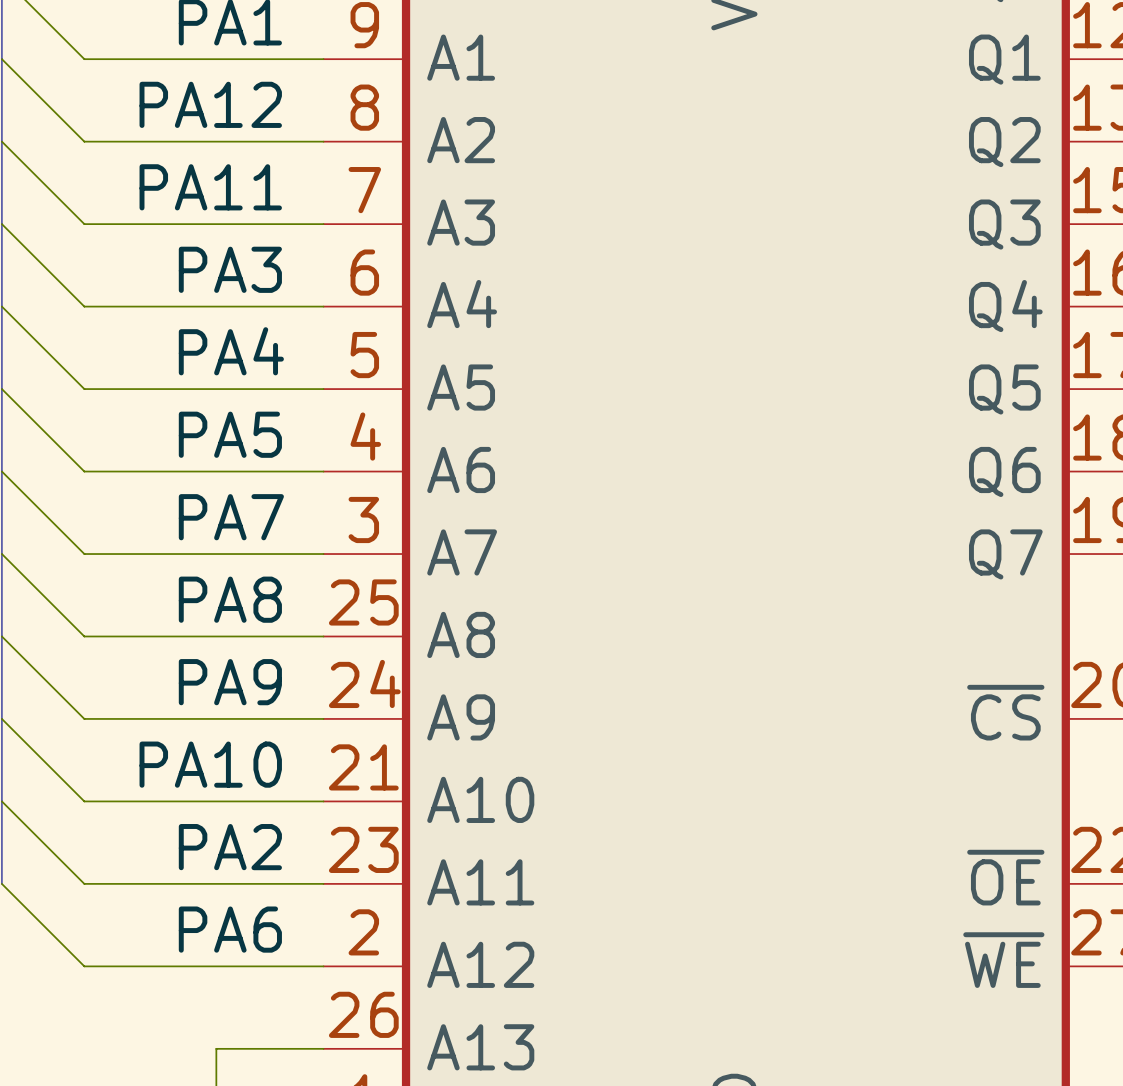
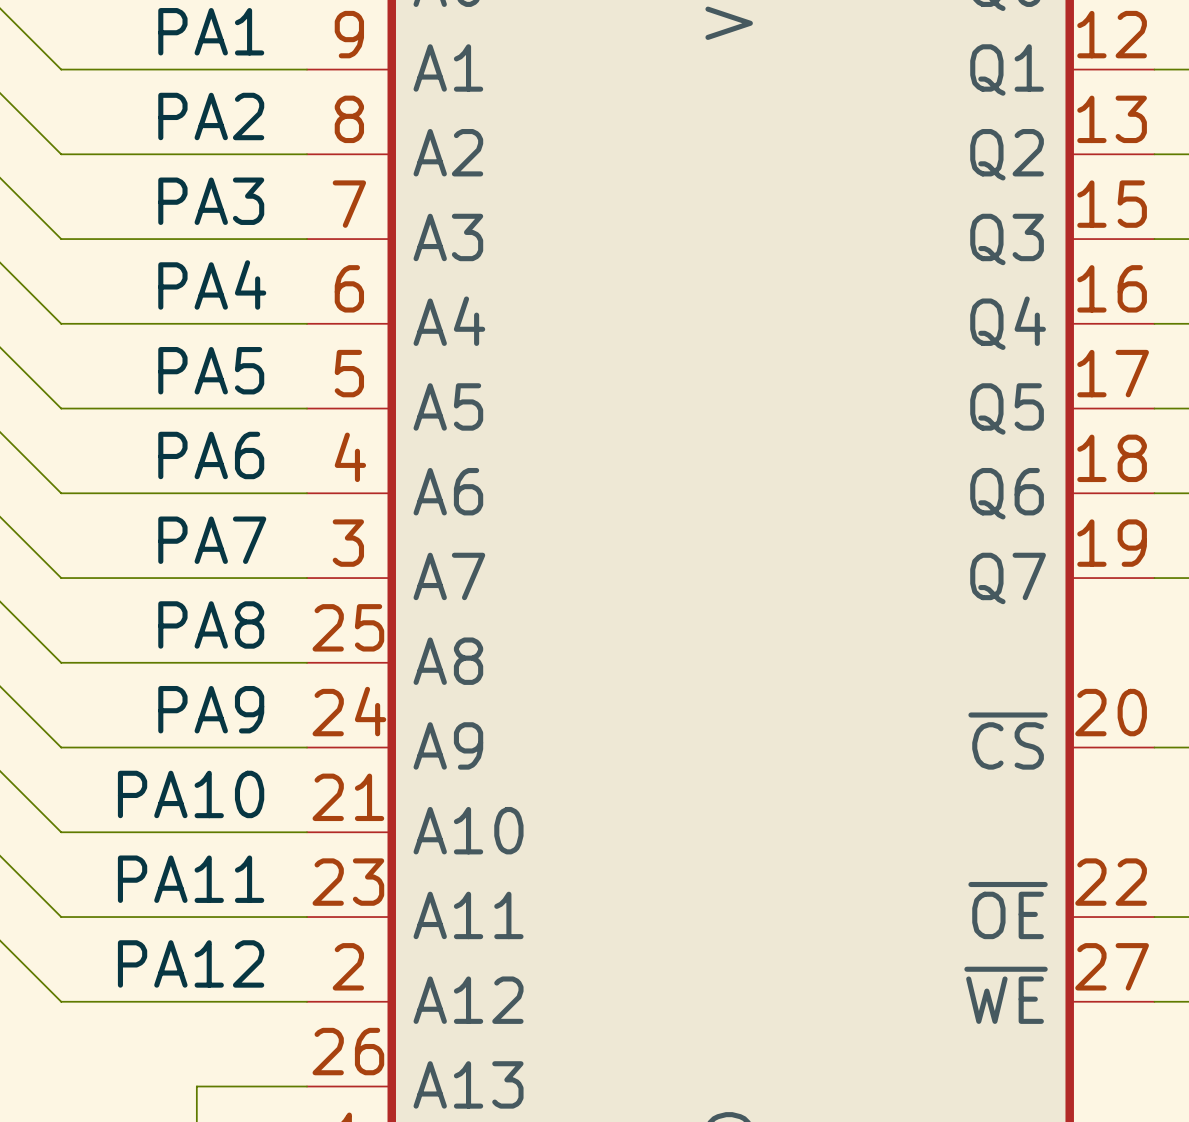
label: PA12 (210, 104) -> PA2 (211, 116)
label: PA11 (210, 187) -> PA3 (211, 201)
label: PA3 (230, 269) -> PA4 (212, 284)
label: PA4 (231, 351) -> PA5 (211, 370)
label: PA5 (230, 434) -> PA6 (211, 455)
label: PA2 (230, 847) -> PA11 (191, 879)
label: PA6 (230, 929) -> PA12 (191, 963)

